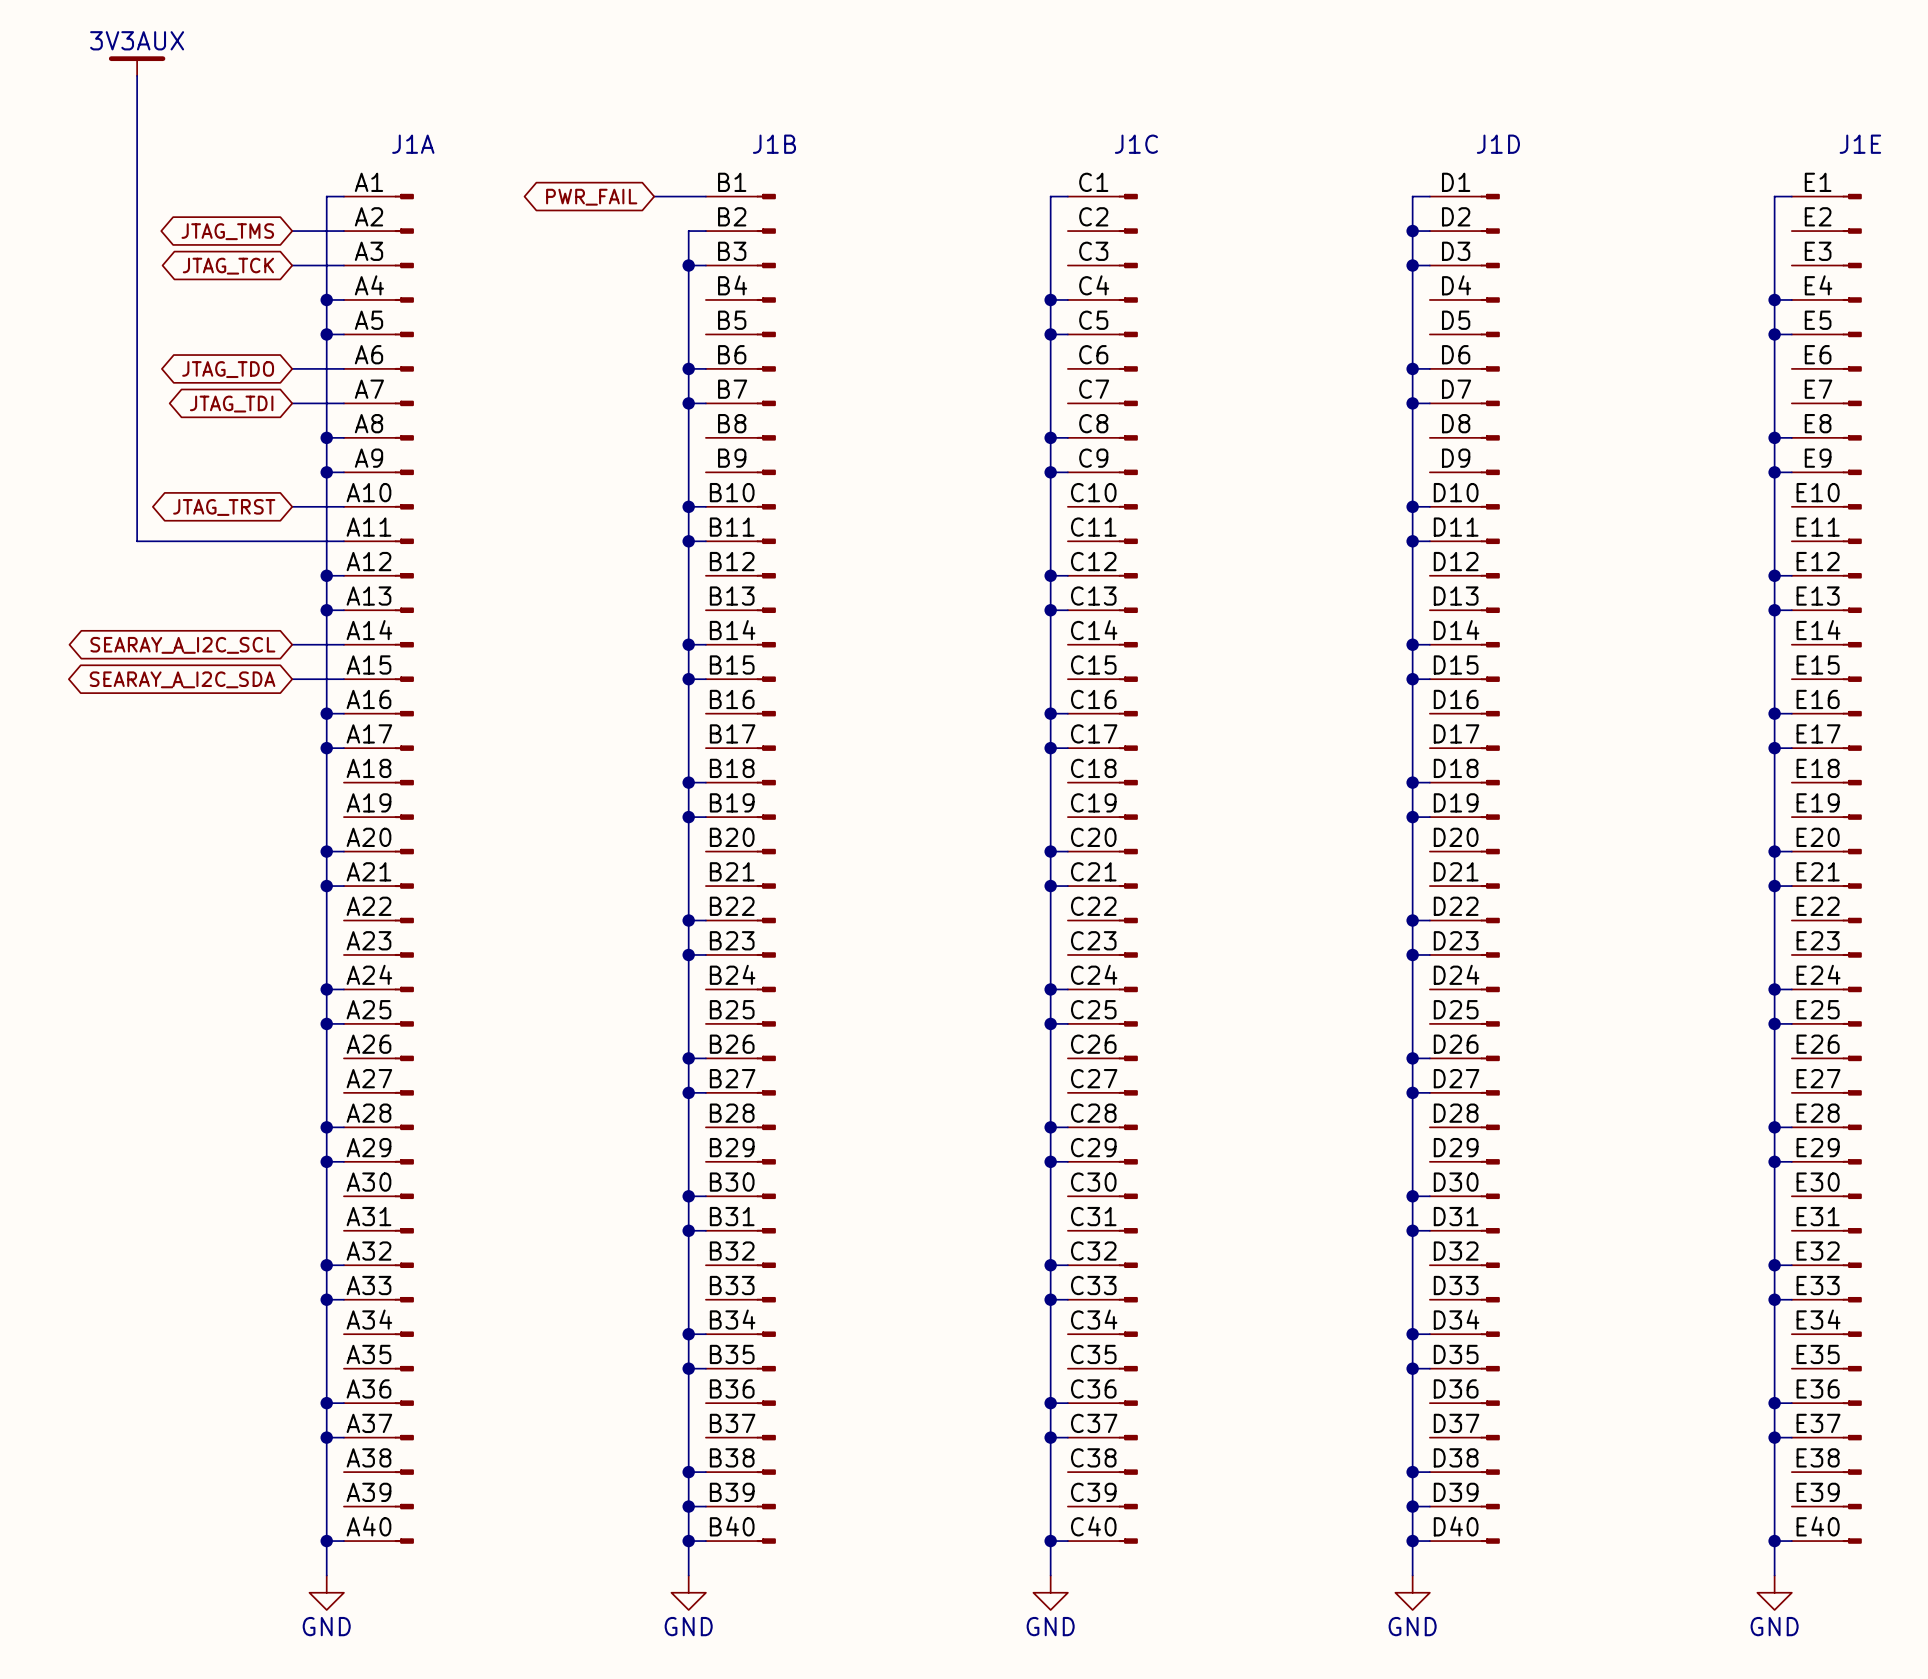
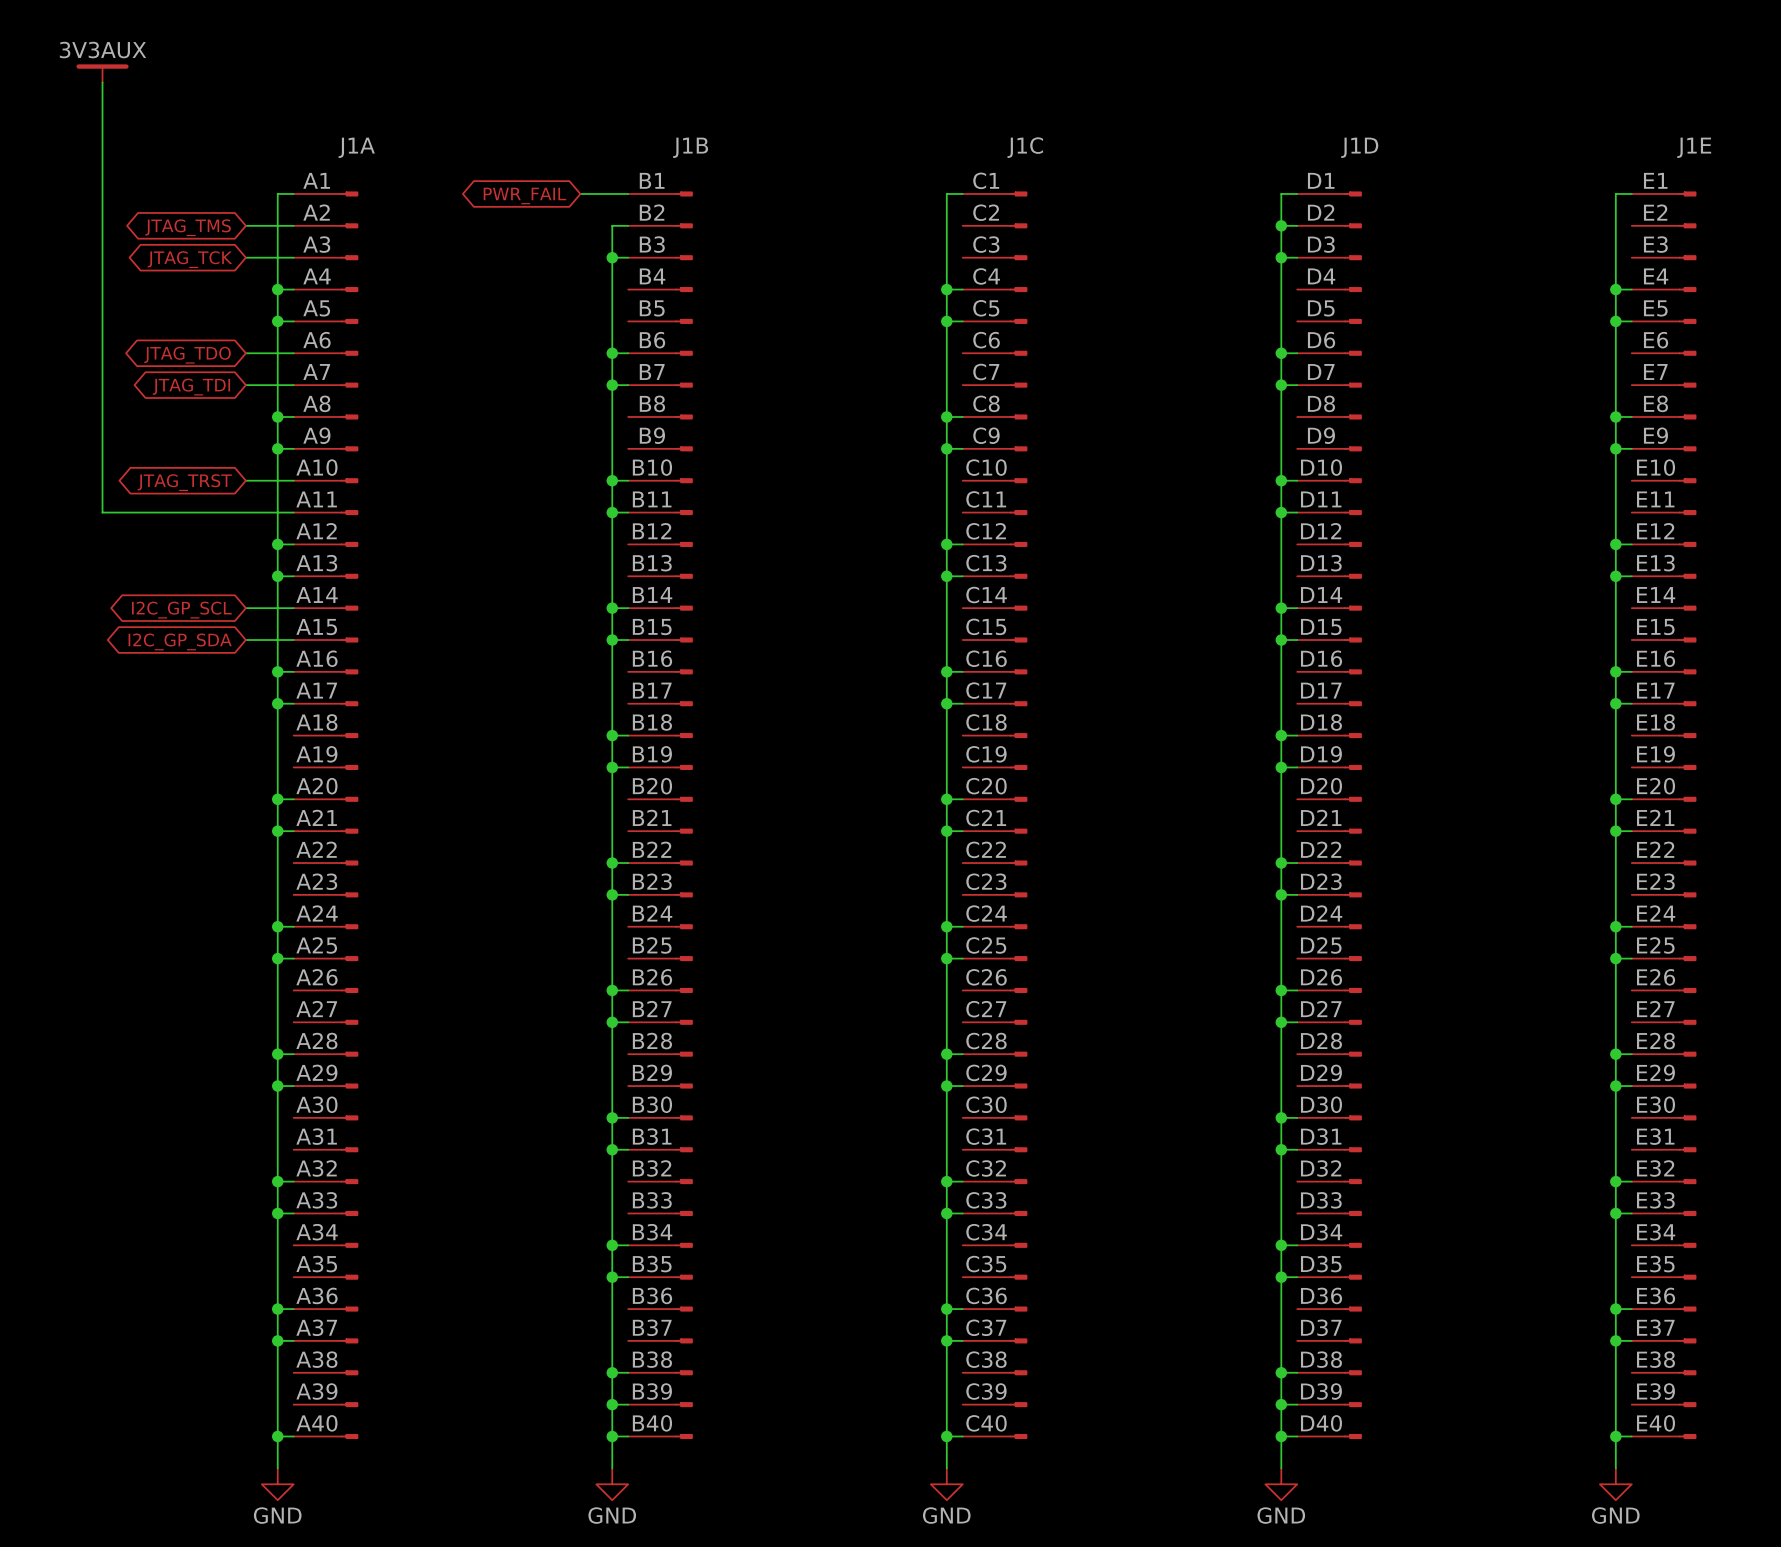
global label: SEARAY_A_I2C_SCL (182, 645) -> I2C_GP_SCL (181, 610)
global label: SEARAY_A_I2C_SDA (182, 679) -> I2C_GP_SDA (180, 641)

